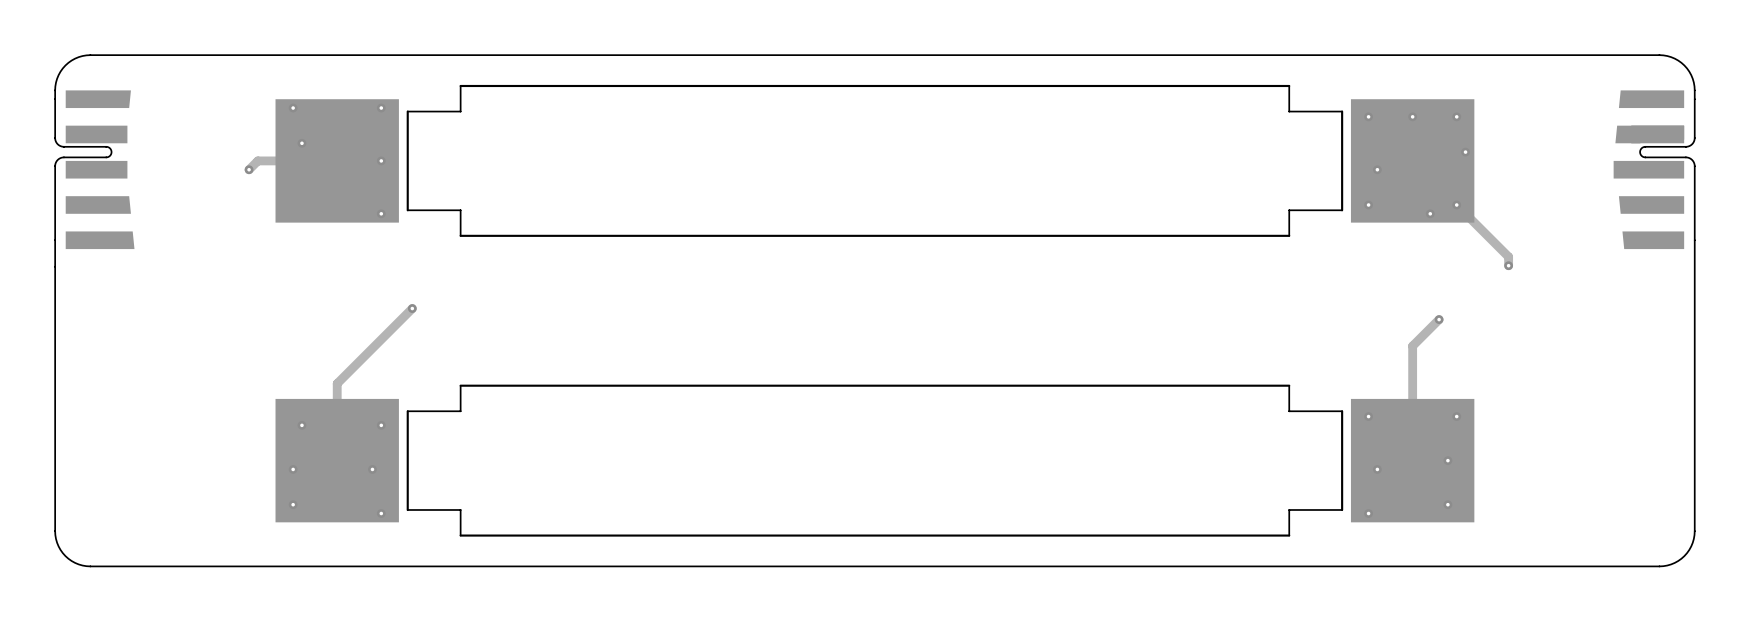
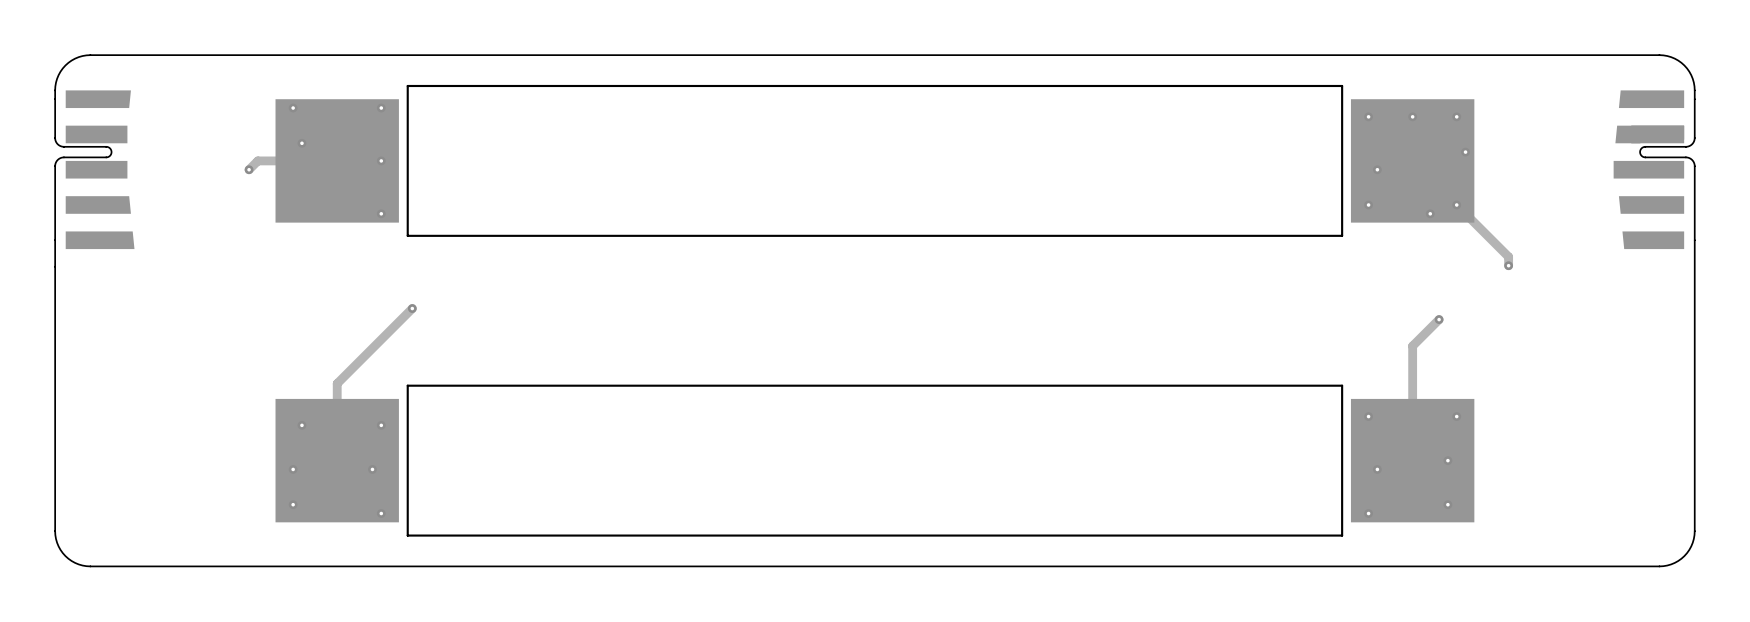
part footprint: [275, 84, 1475, 237] -> [275, 84, 1475, 237]
part footprint: [275, 384, 1475, 537] -> [275, 384, 1475, 537]

